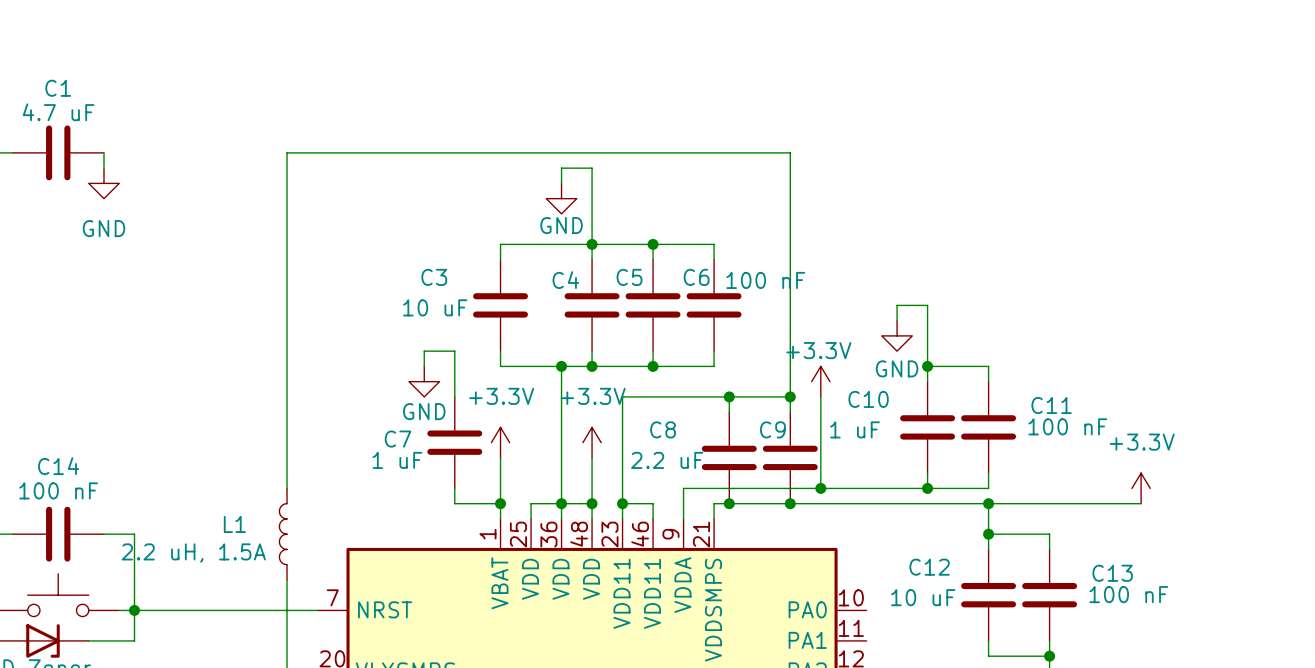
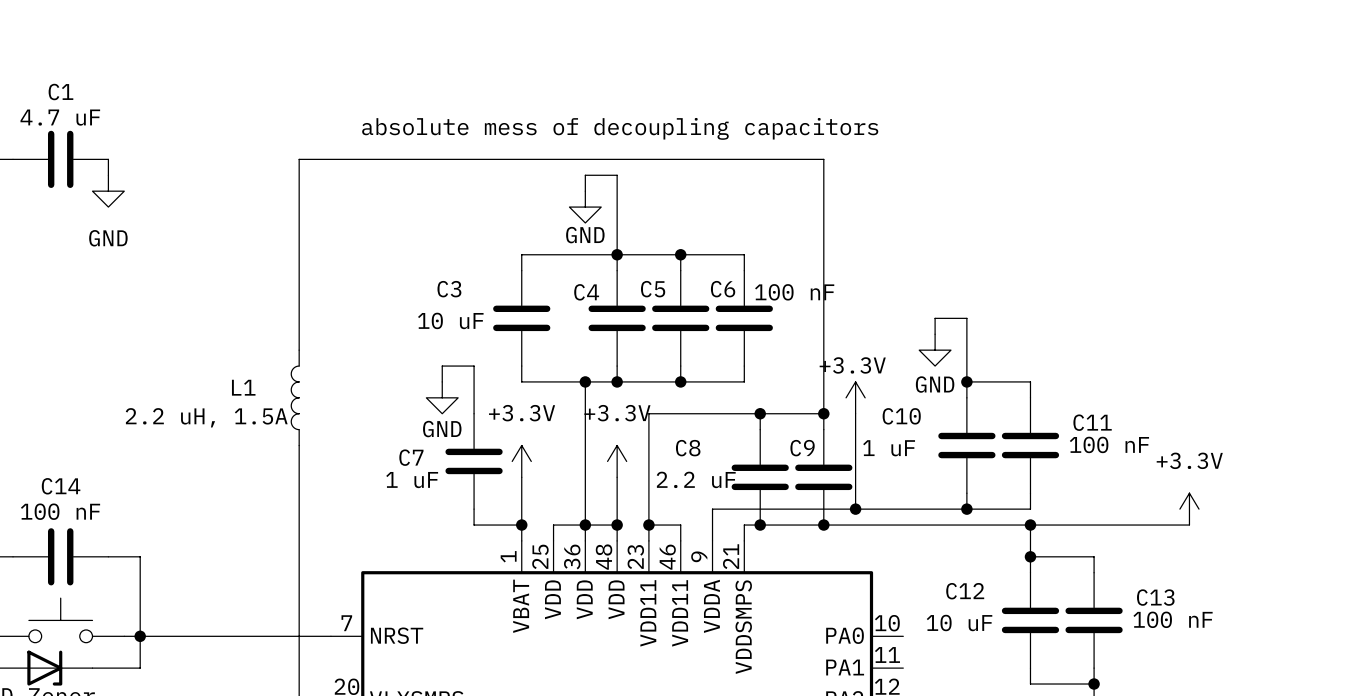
text: none -> absolute mess of decoupling capacitors (620, 128)
wire: (287, 335) (287, 427) -> (299, 509) (299, 604)
L1 position: (283, 534) -> (295, 397)

